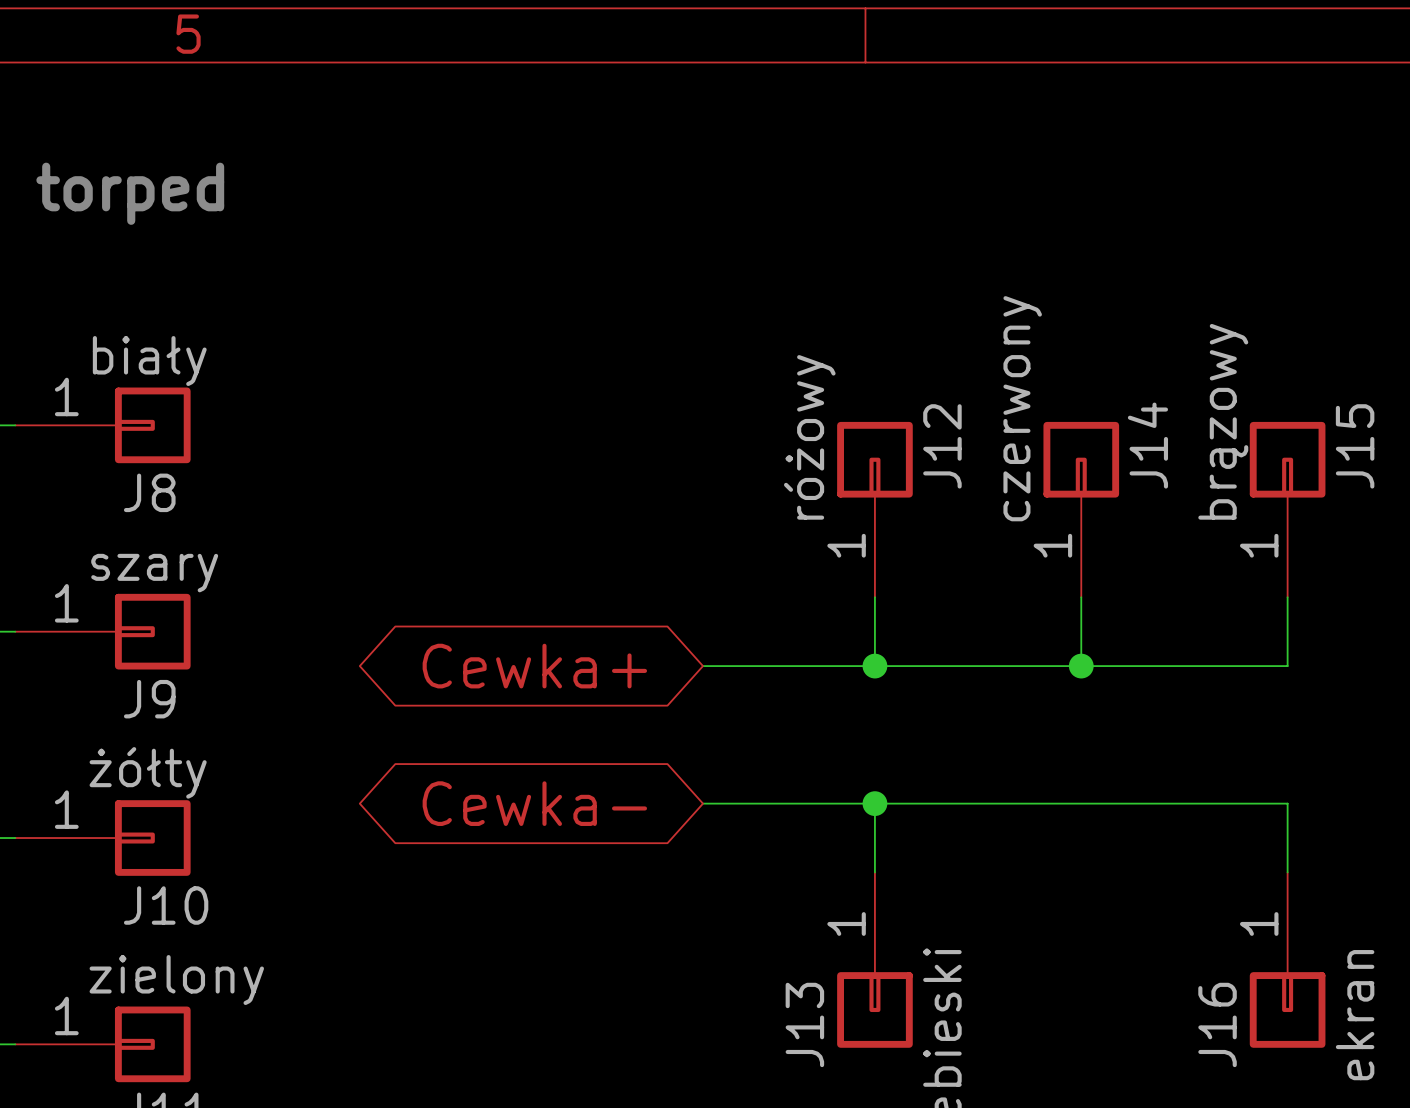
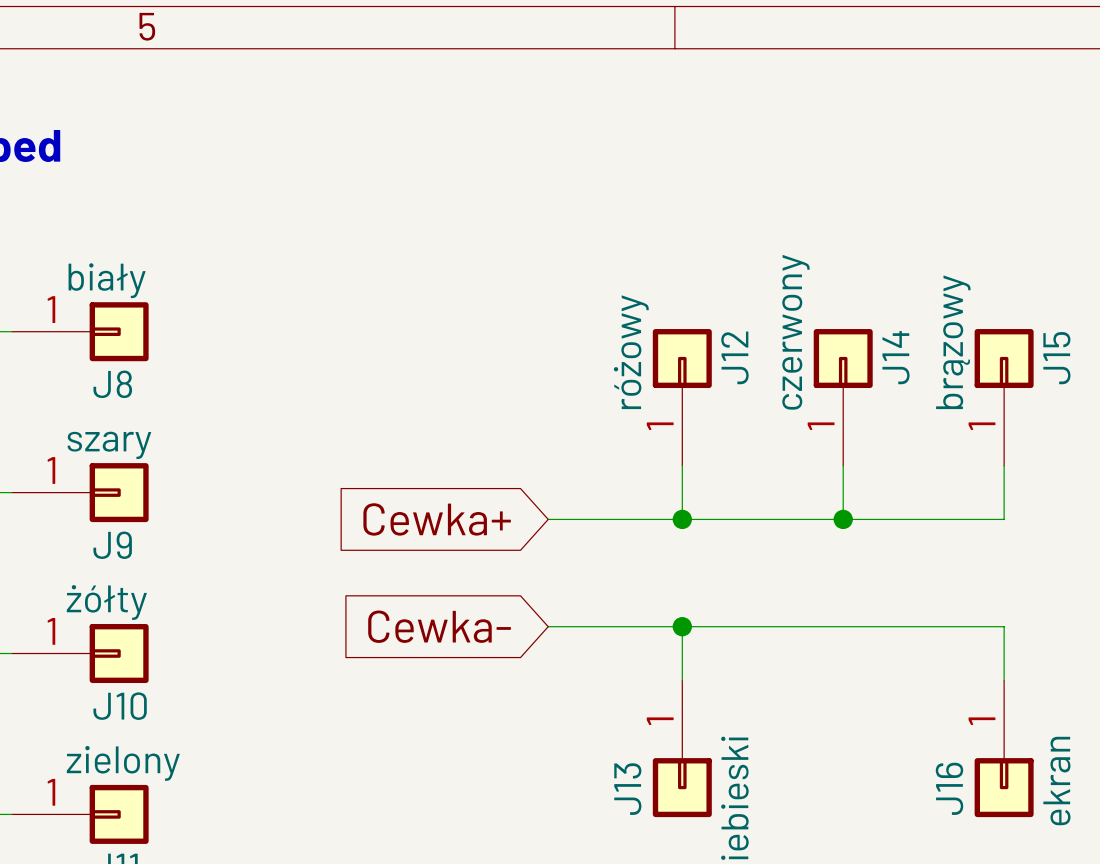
global label shape: bidirectional (534, 666) -> input (437, 519)
global label shape: bidirectional (534, 803) -> input (439, 626)

